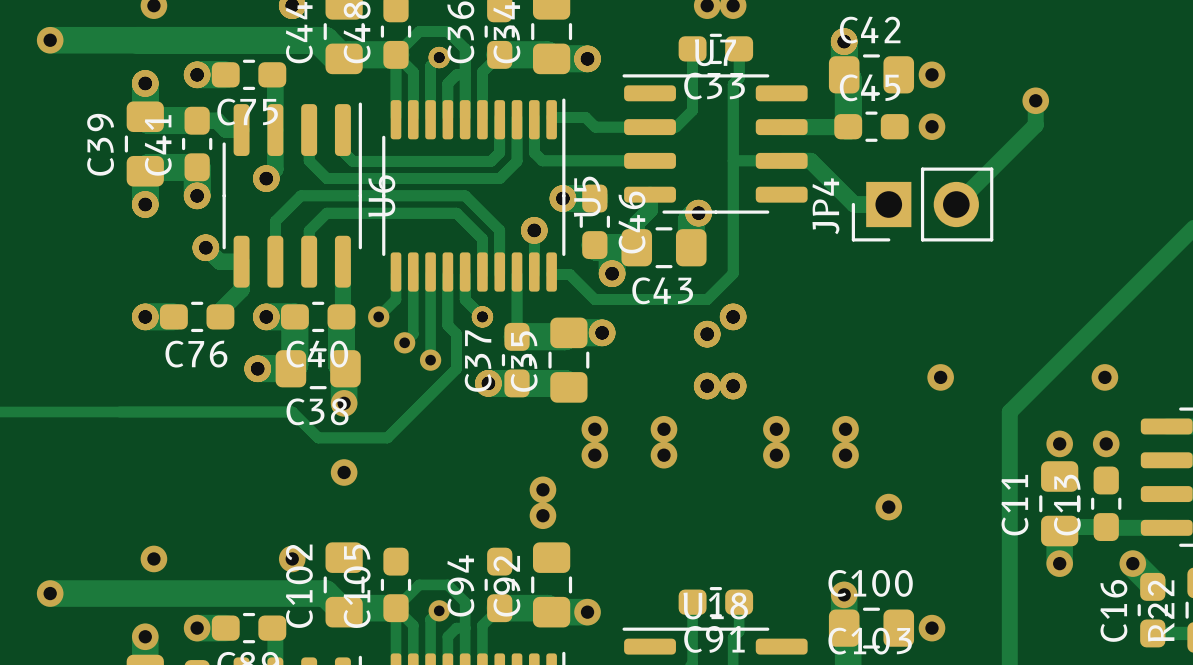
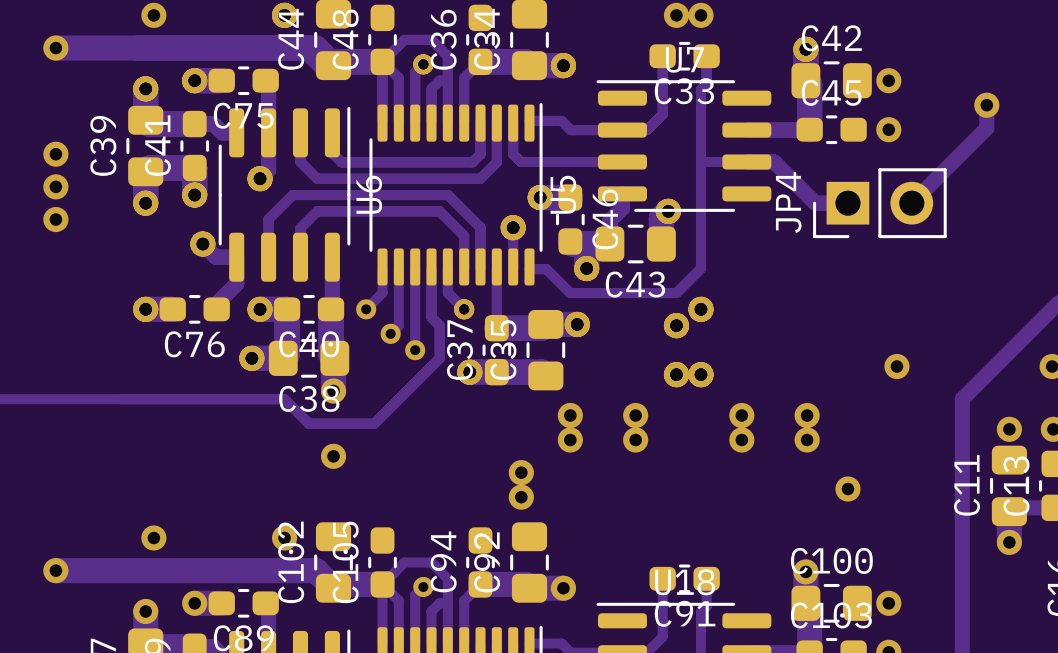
via: none -> (55, 154)
via: none -> (55, 186)
via: none -> (55, 219)

